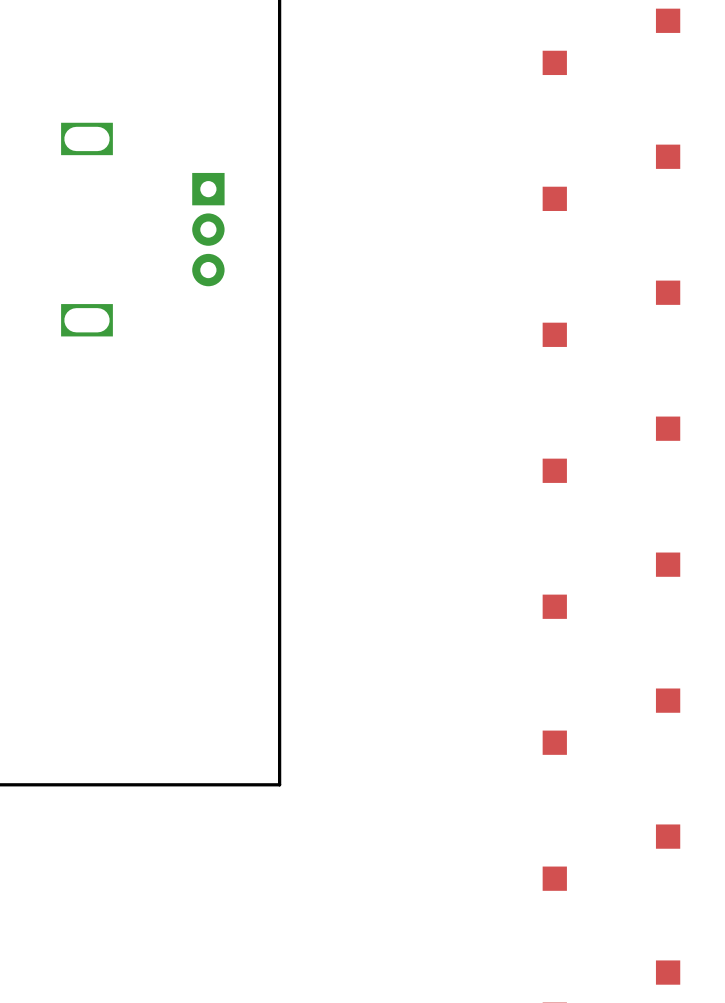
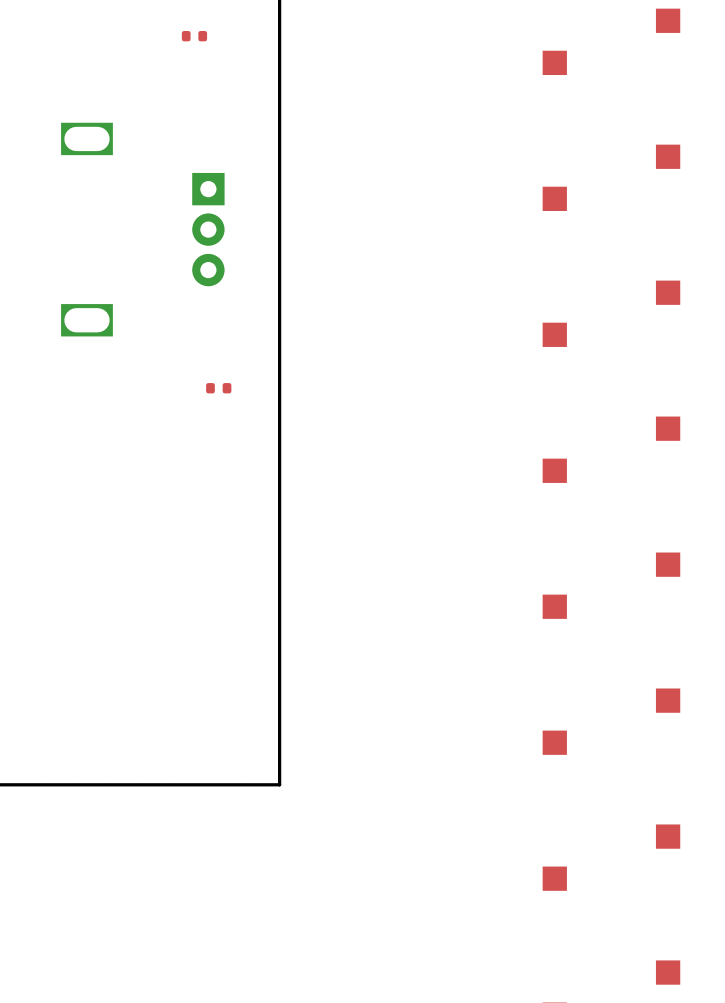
part: none -> (194, 36)
part: none -> (218, 388)

